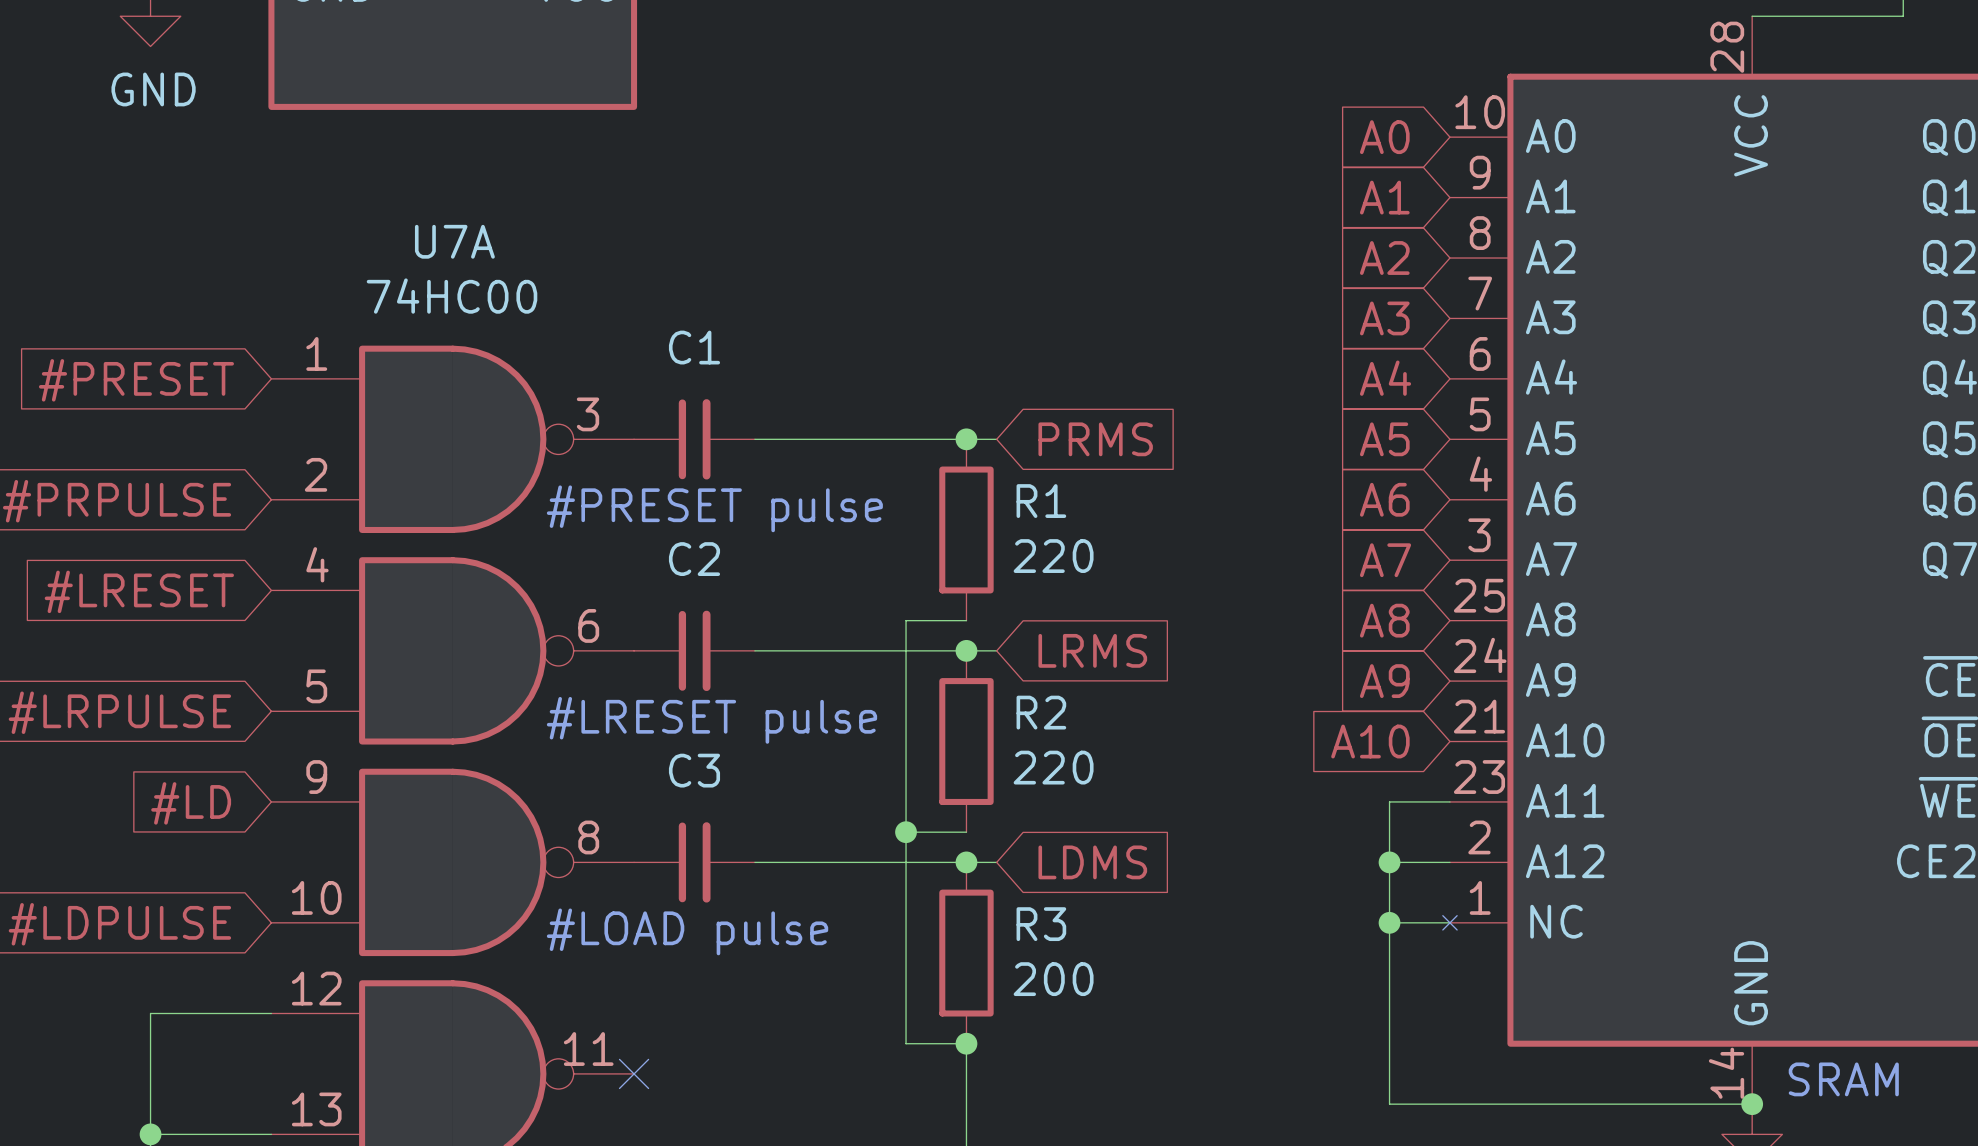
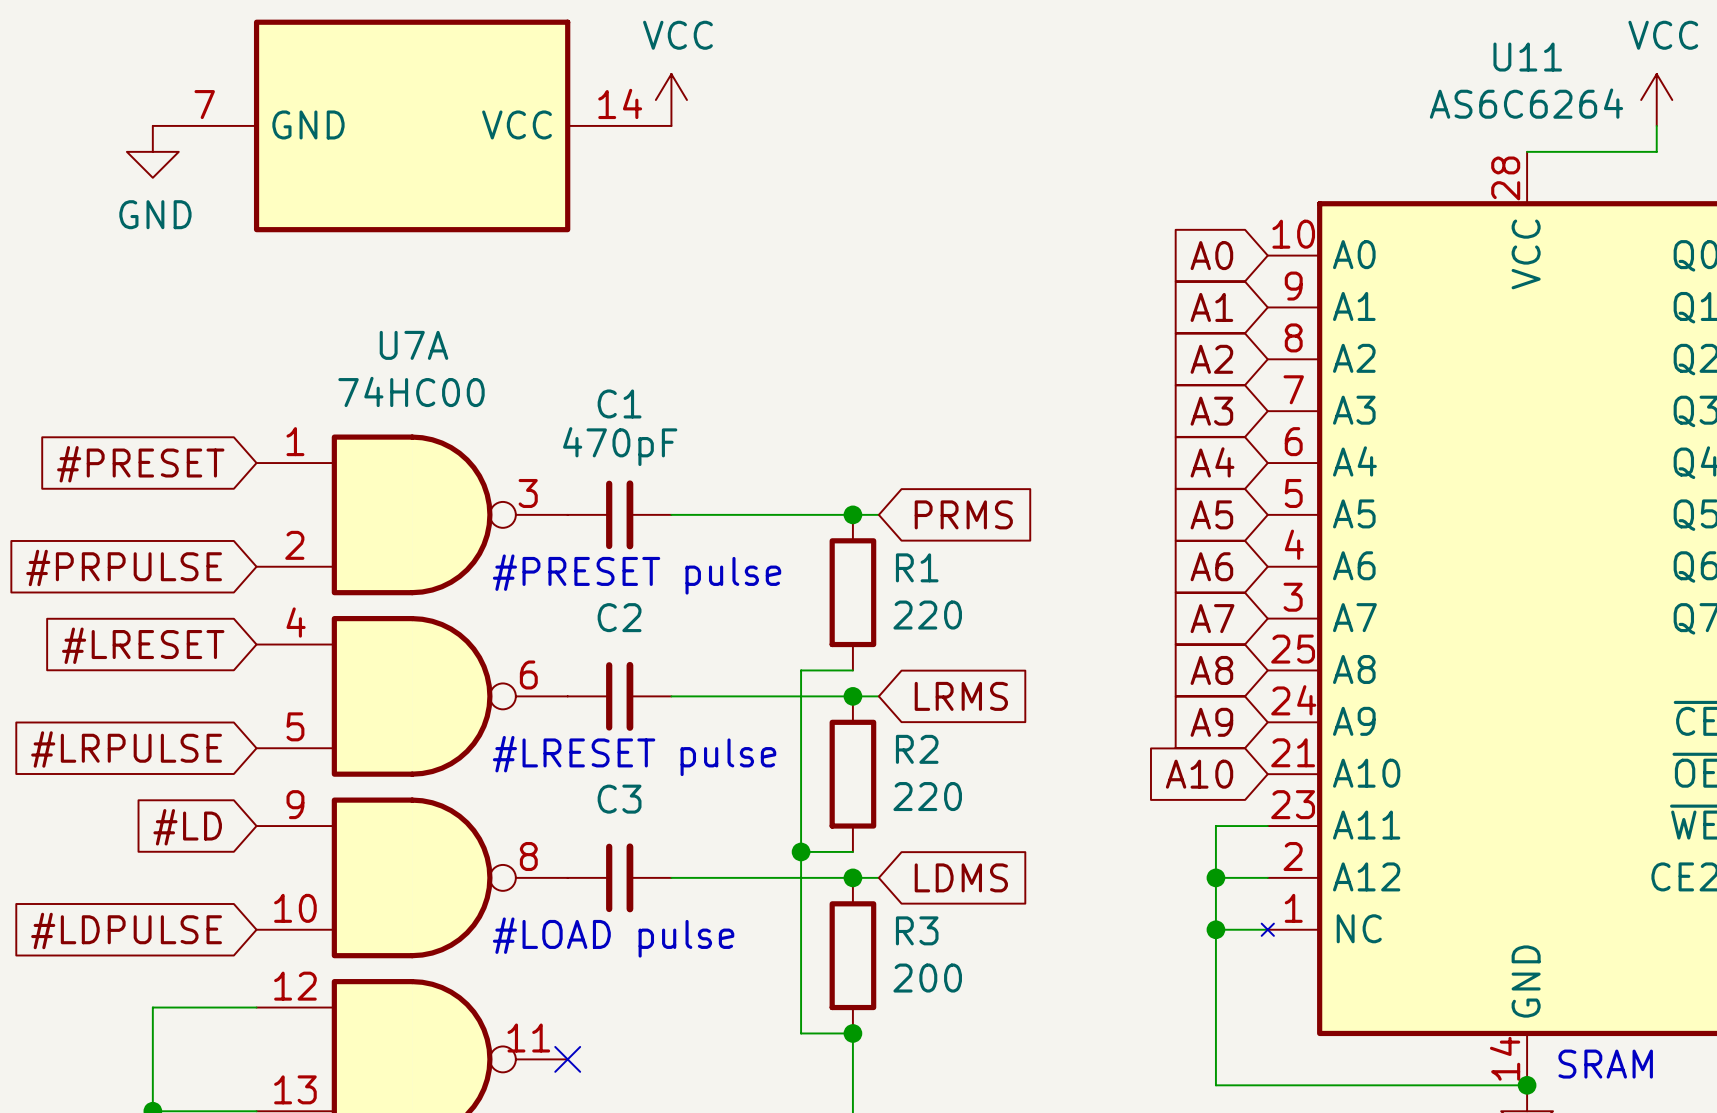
C1 name position: C1 (694, 347) -> C1 (619, 403)
C1 value: none -> 470pF (620, 446)

